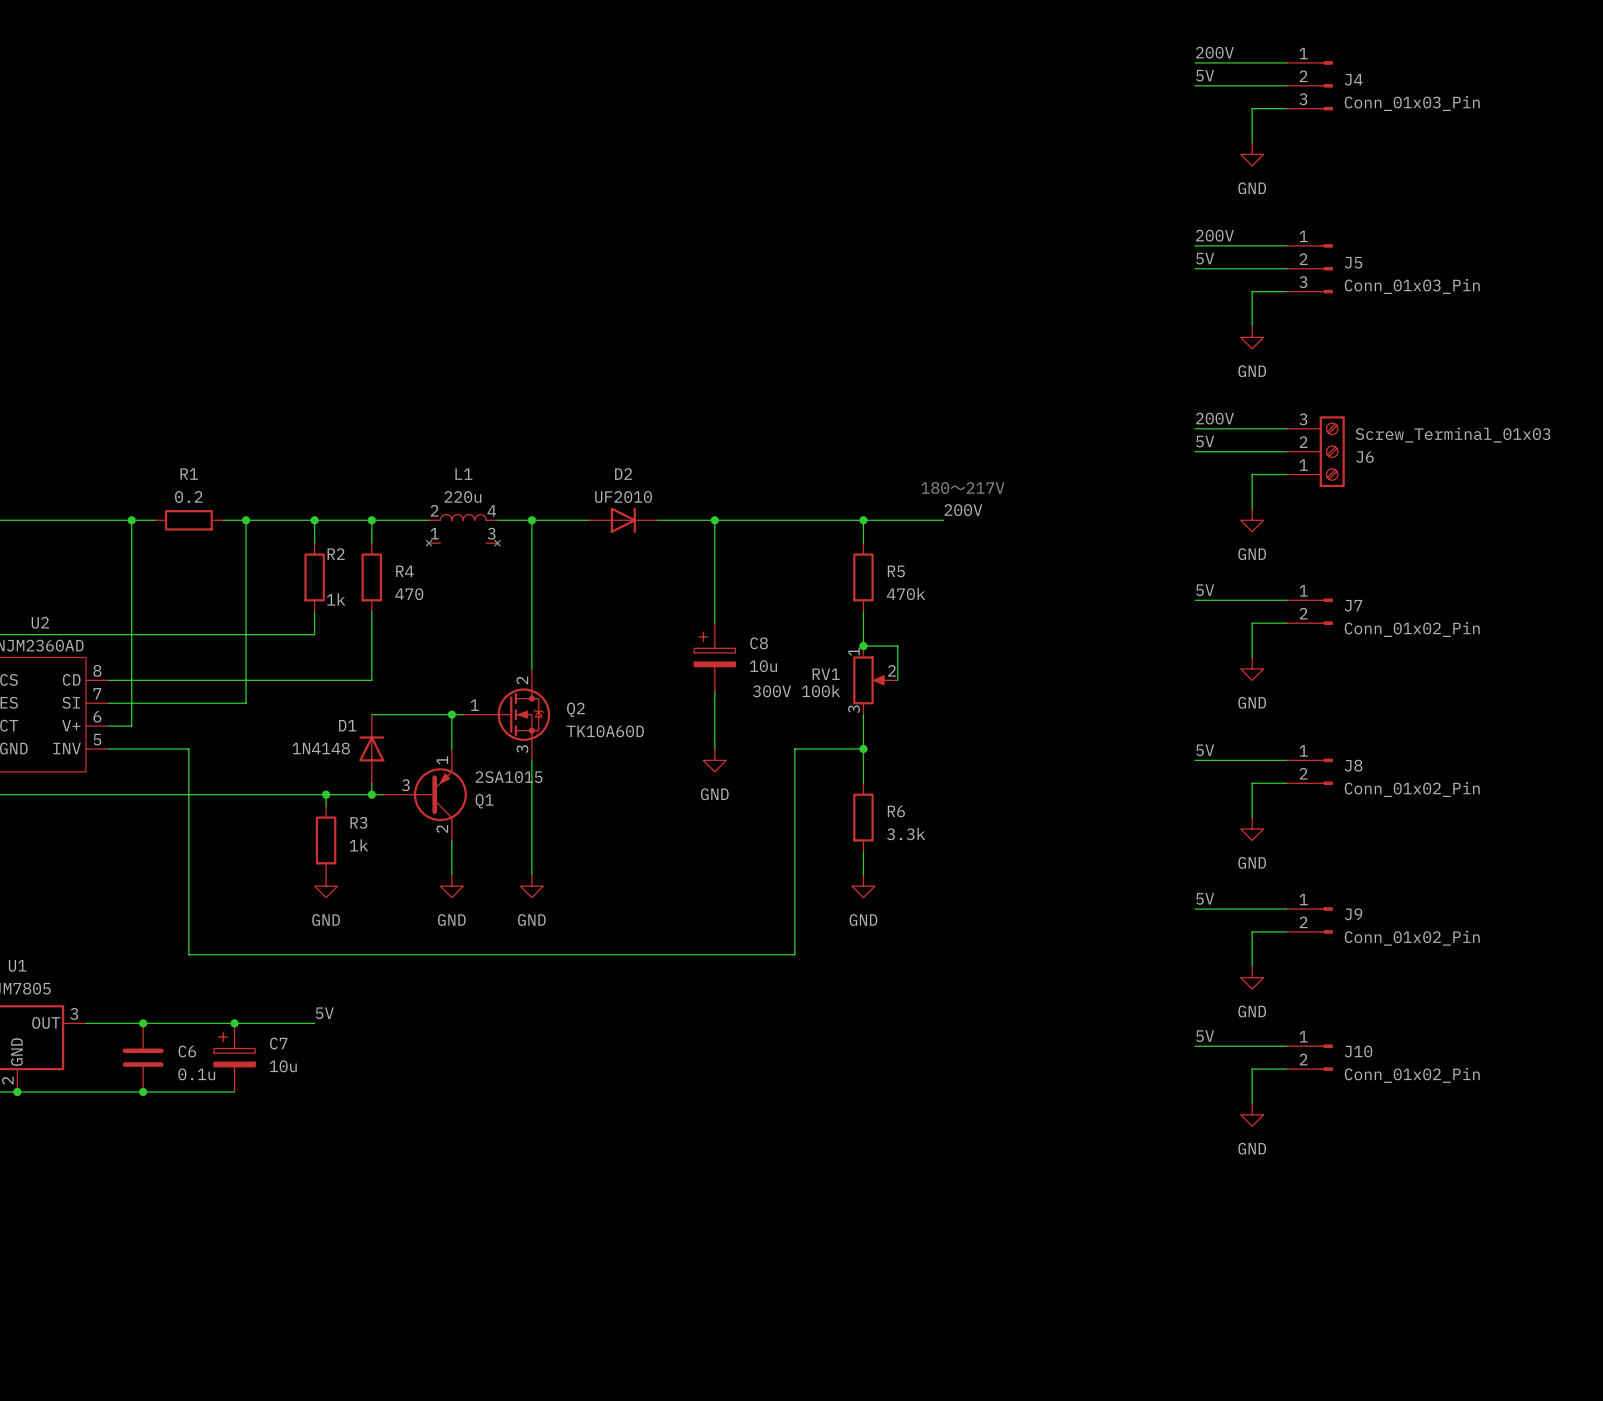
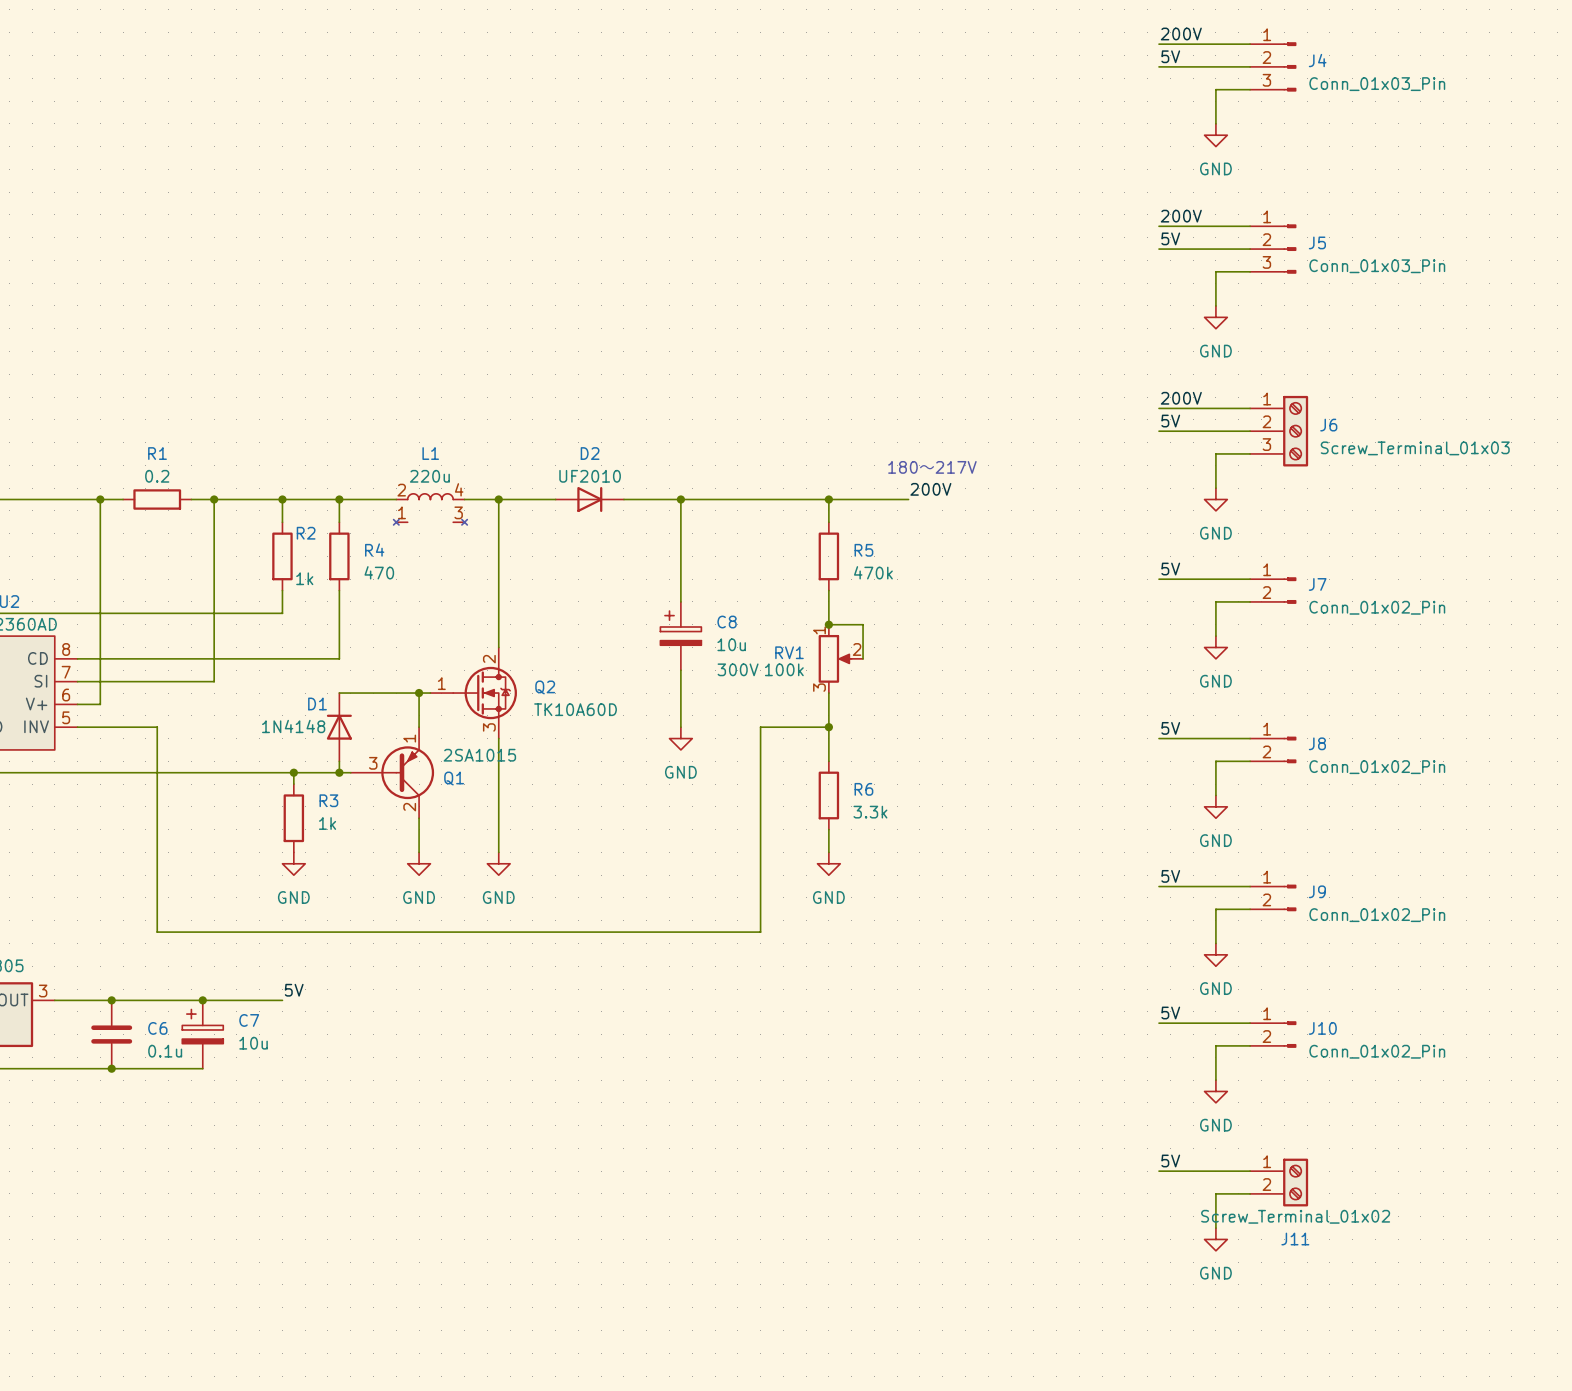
J6 flip: as is (1332, 451) -> up-down (1295, 431)
label: none -> 5V (1170, 1160)
wire: none -> (1159, 1171) (1250, 1171)
J11: none -> Screw_Terminal_01x02 (1279, 1182)
wire: none -> (1250, 1193) (1215, 1193) (1215, 1228)
power symbol: none -> GND (1215, 1239)

